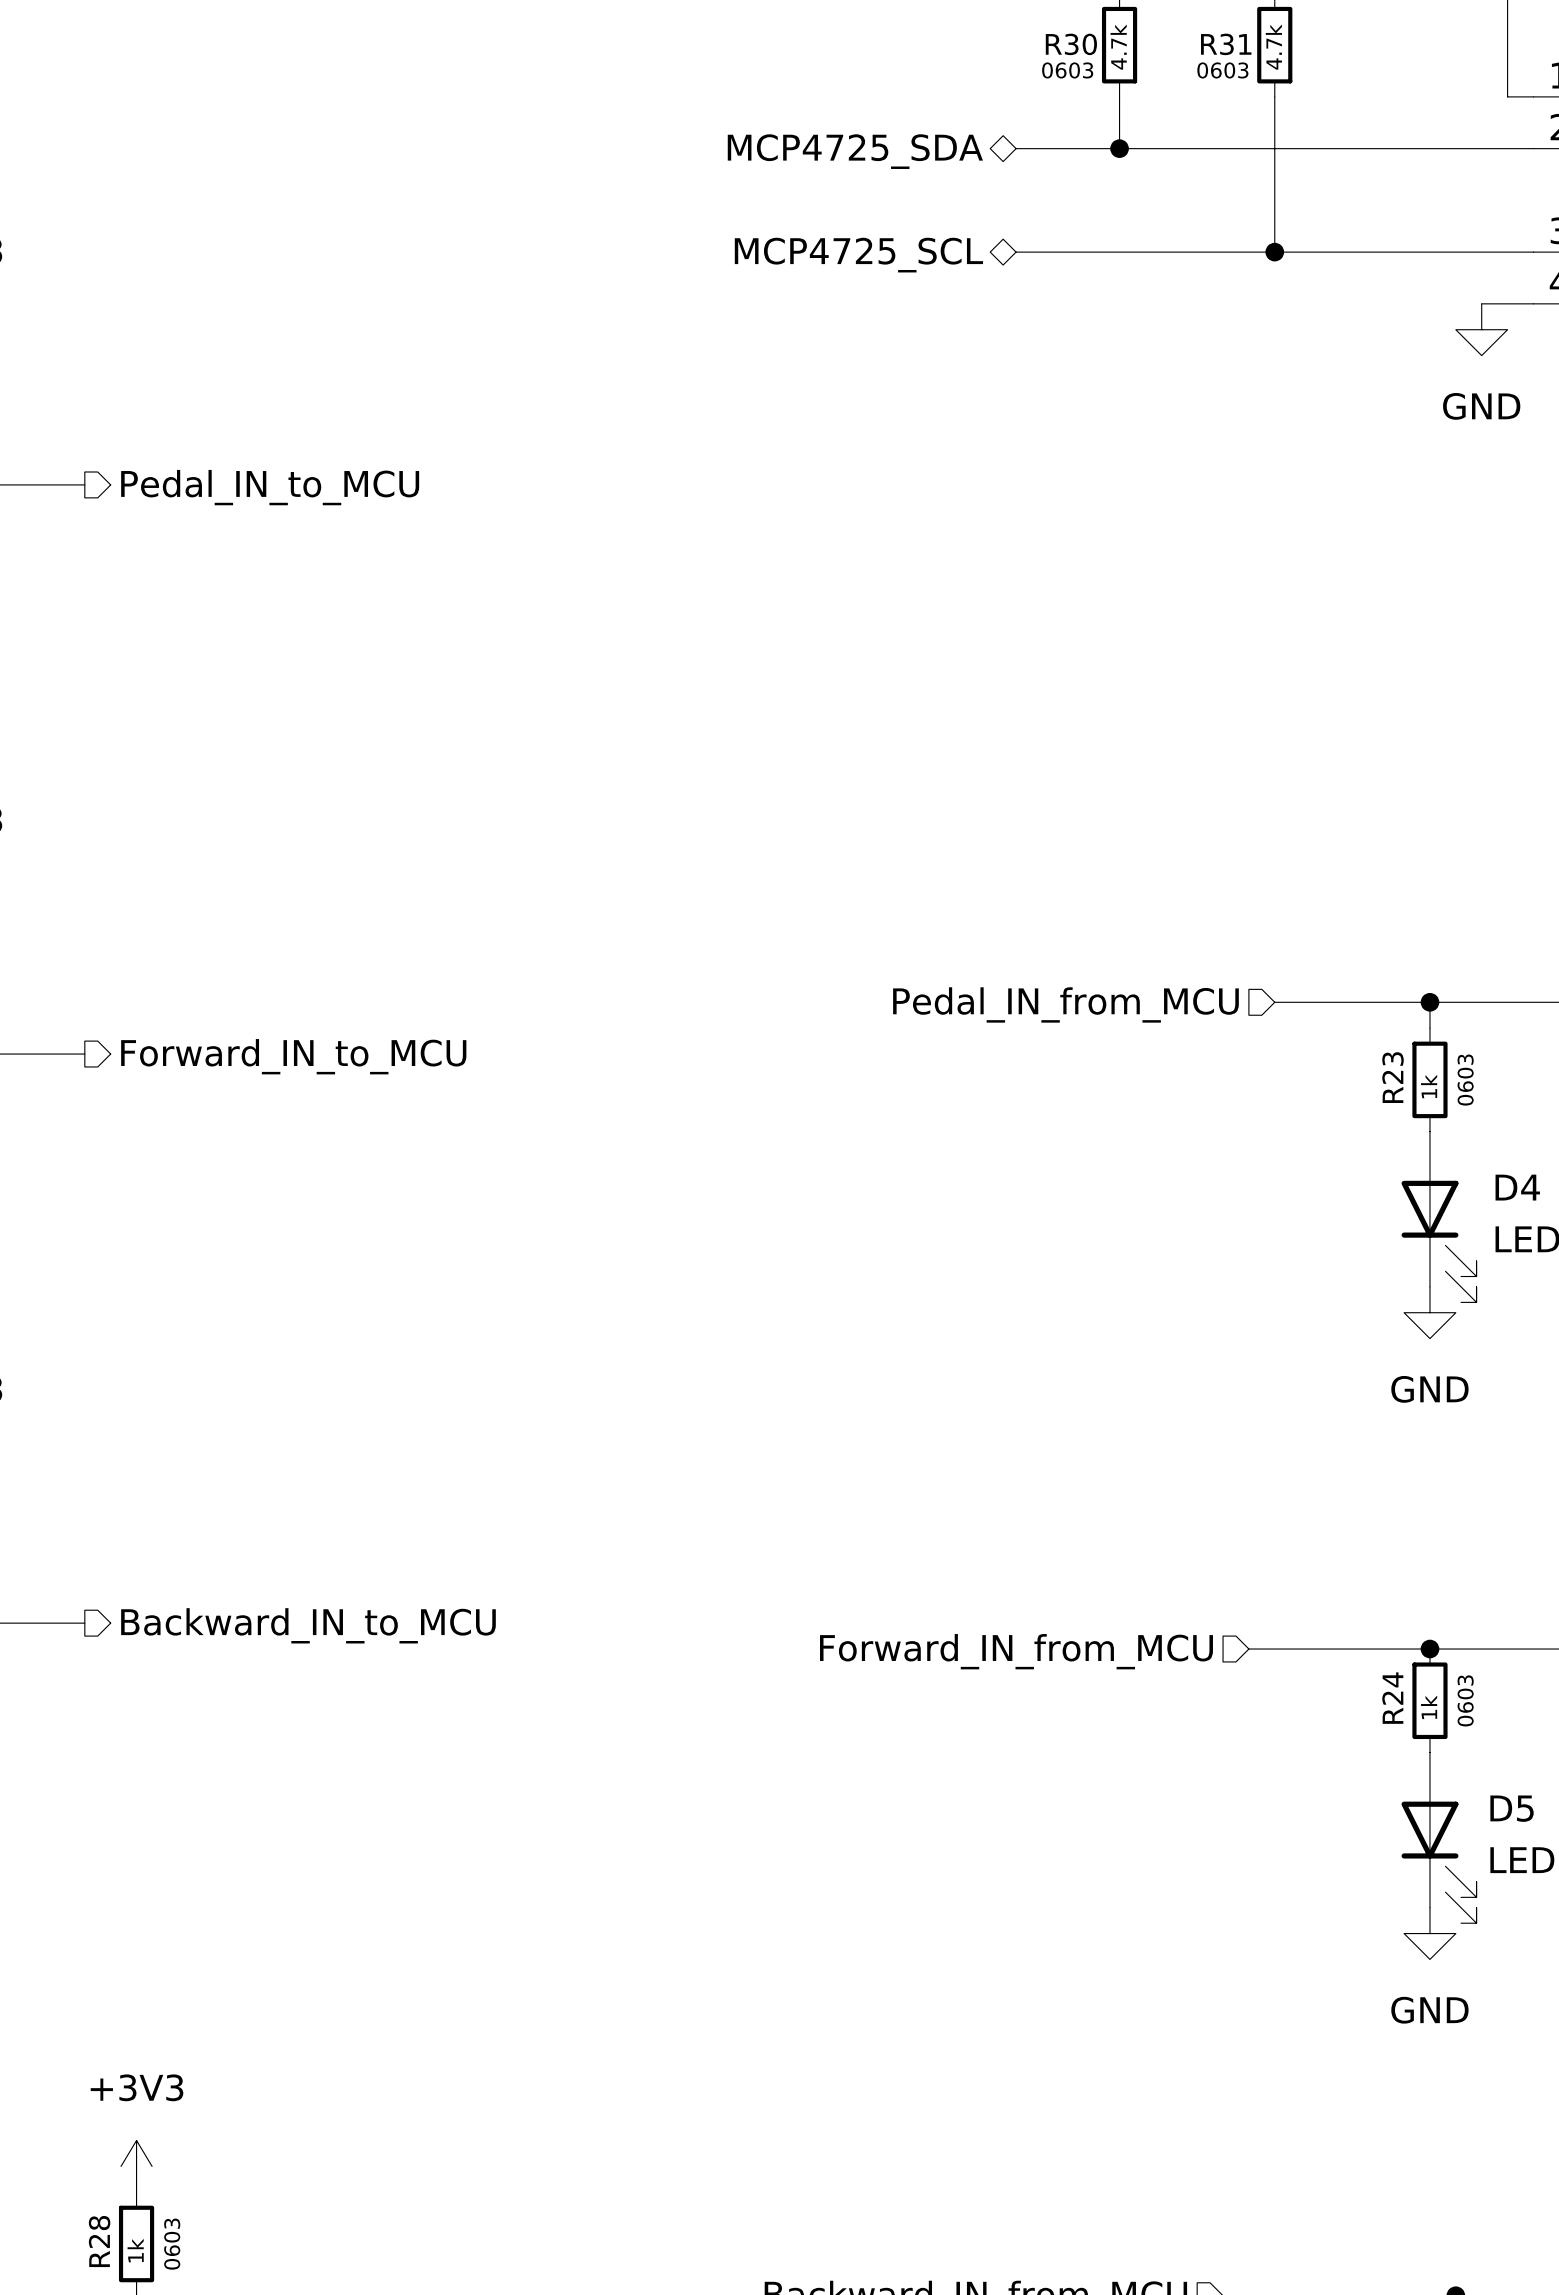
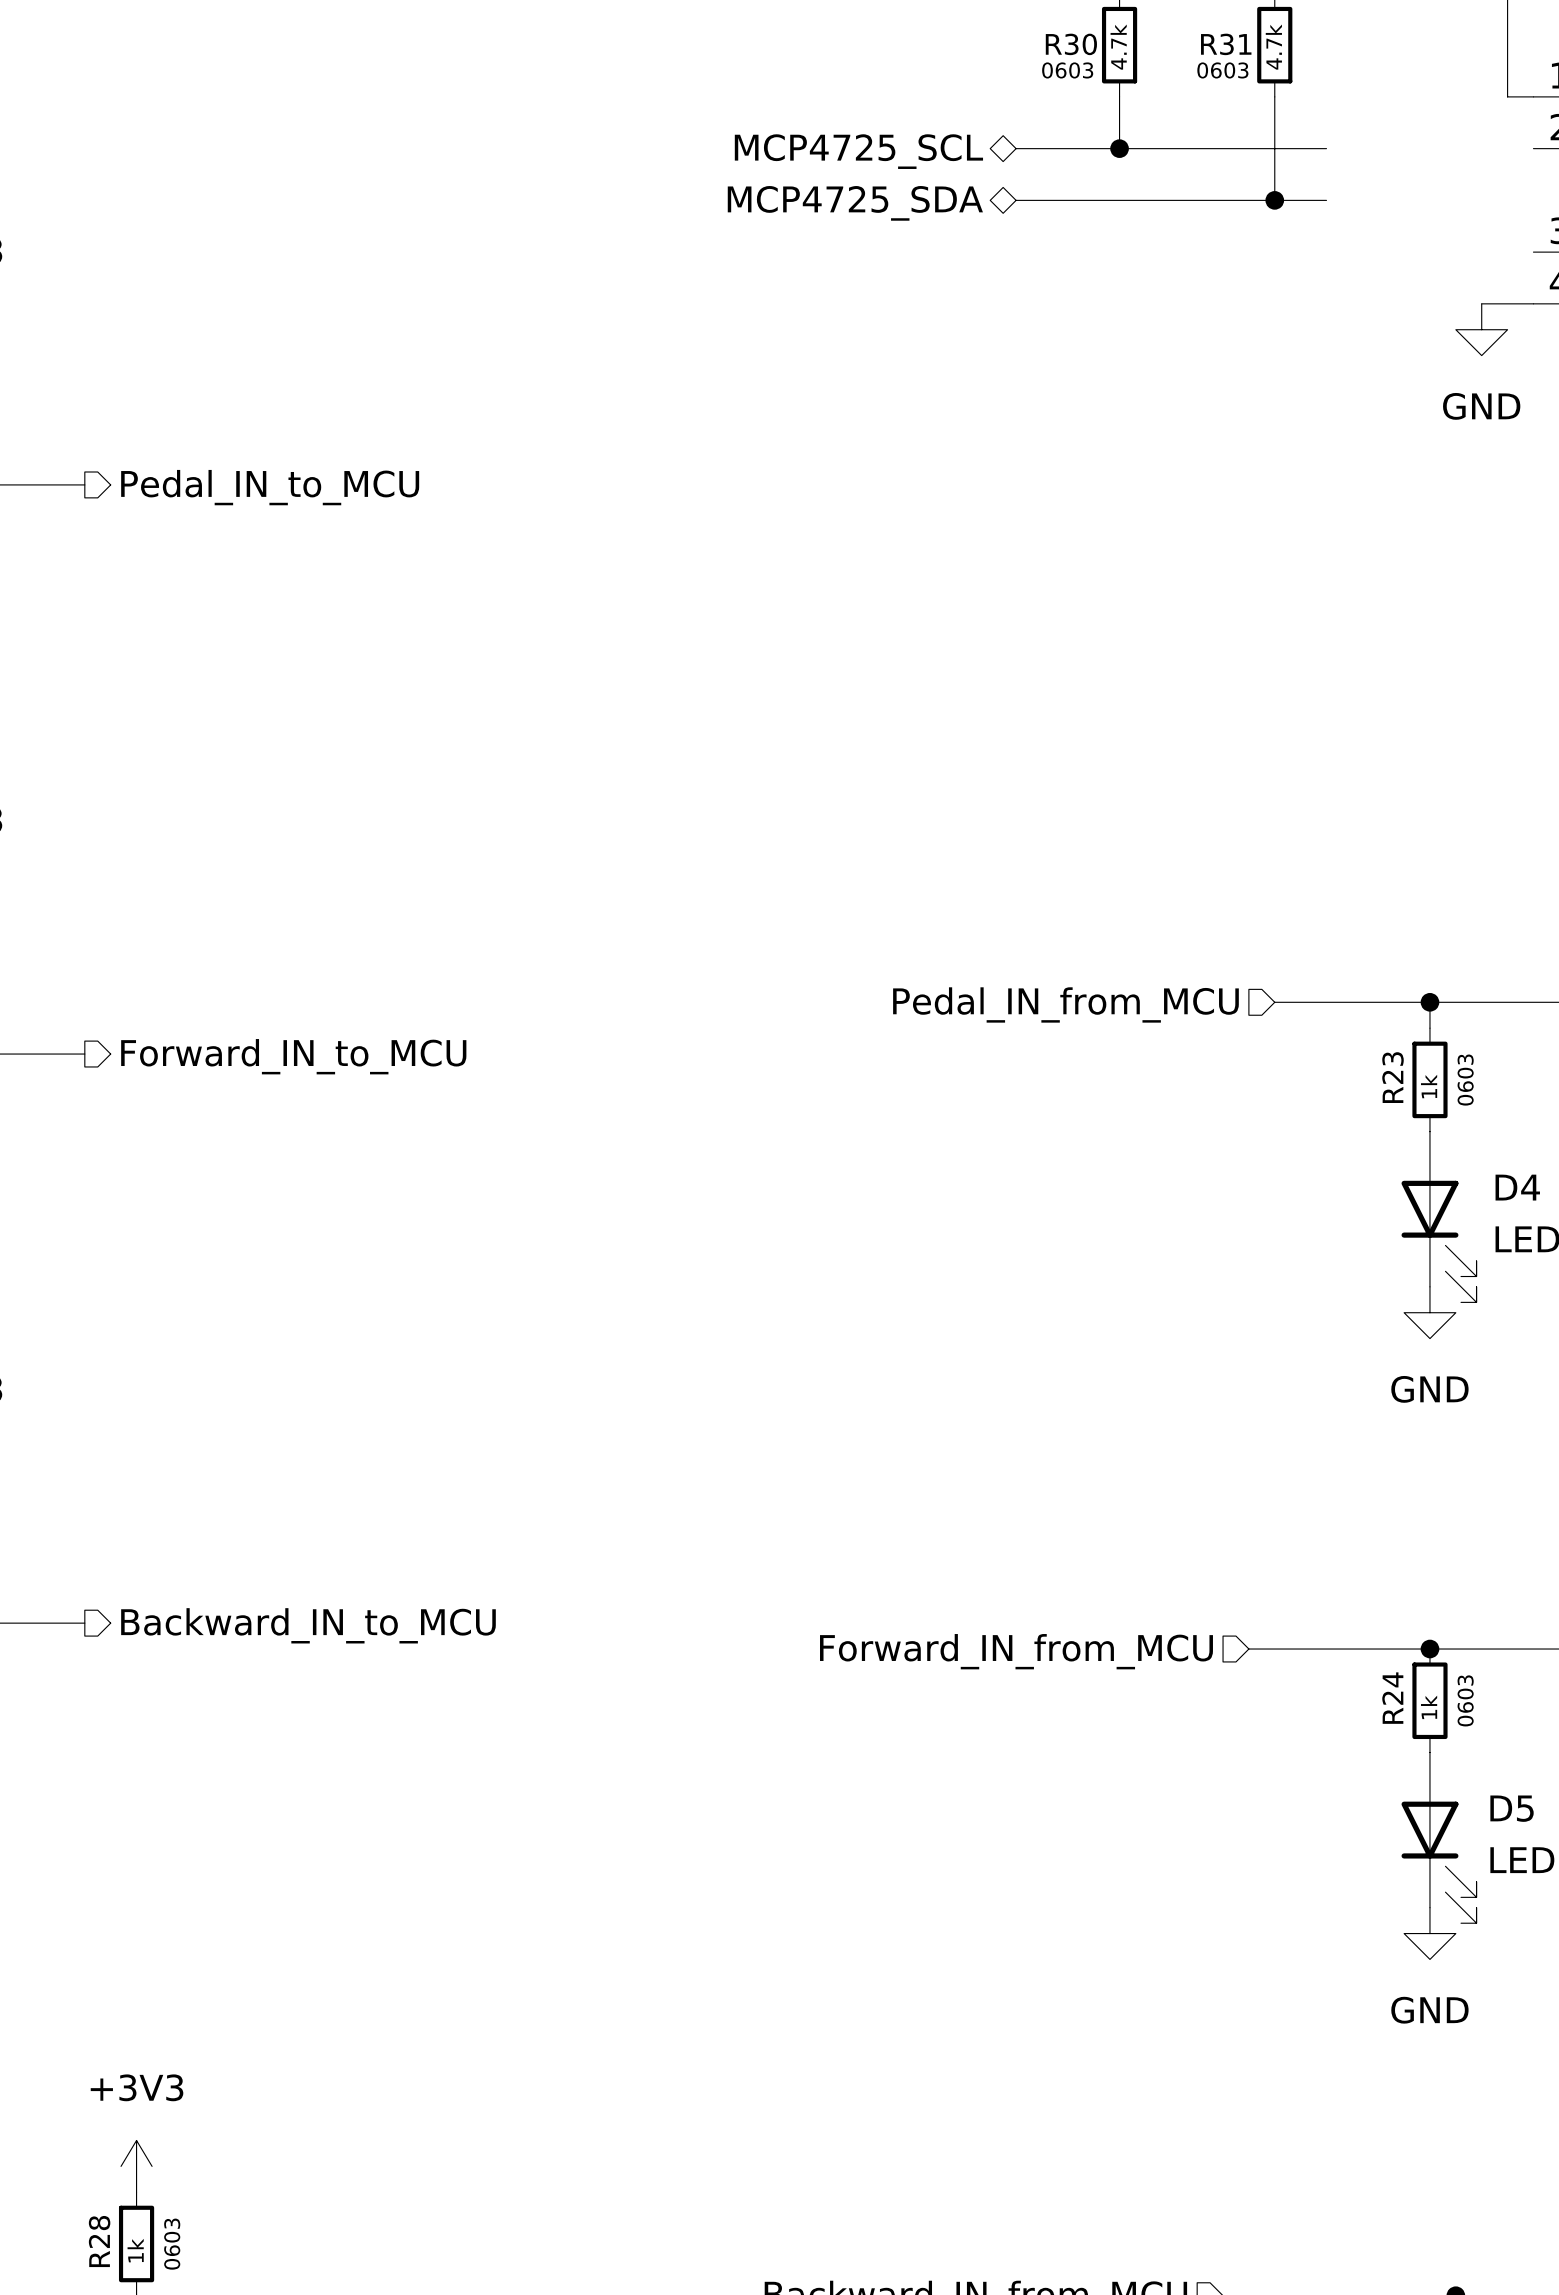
wire: (1326, 148) (1533, 148) -> none
hierarchical label: MCP4725_SDA (855, 151) -> MCP4725_SCL (858, 151)
wire: none -> (1016, 200) (1326, 200)
wire: (1274, 200) (1274, 252) -> none
wire: (1016, 252) (1533, 252) -> none
junction position: (1274, 252) -> (1274, 200)
hierarchical label: MCP4725_SCL (858, 255) -> MCP4725_SDA (855, 203)

